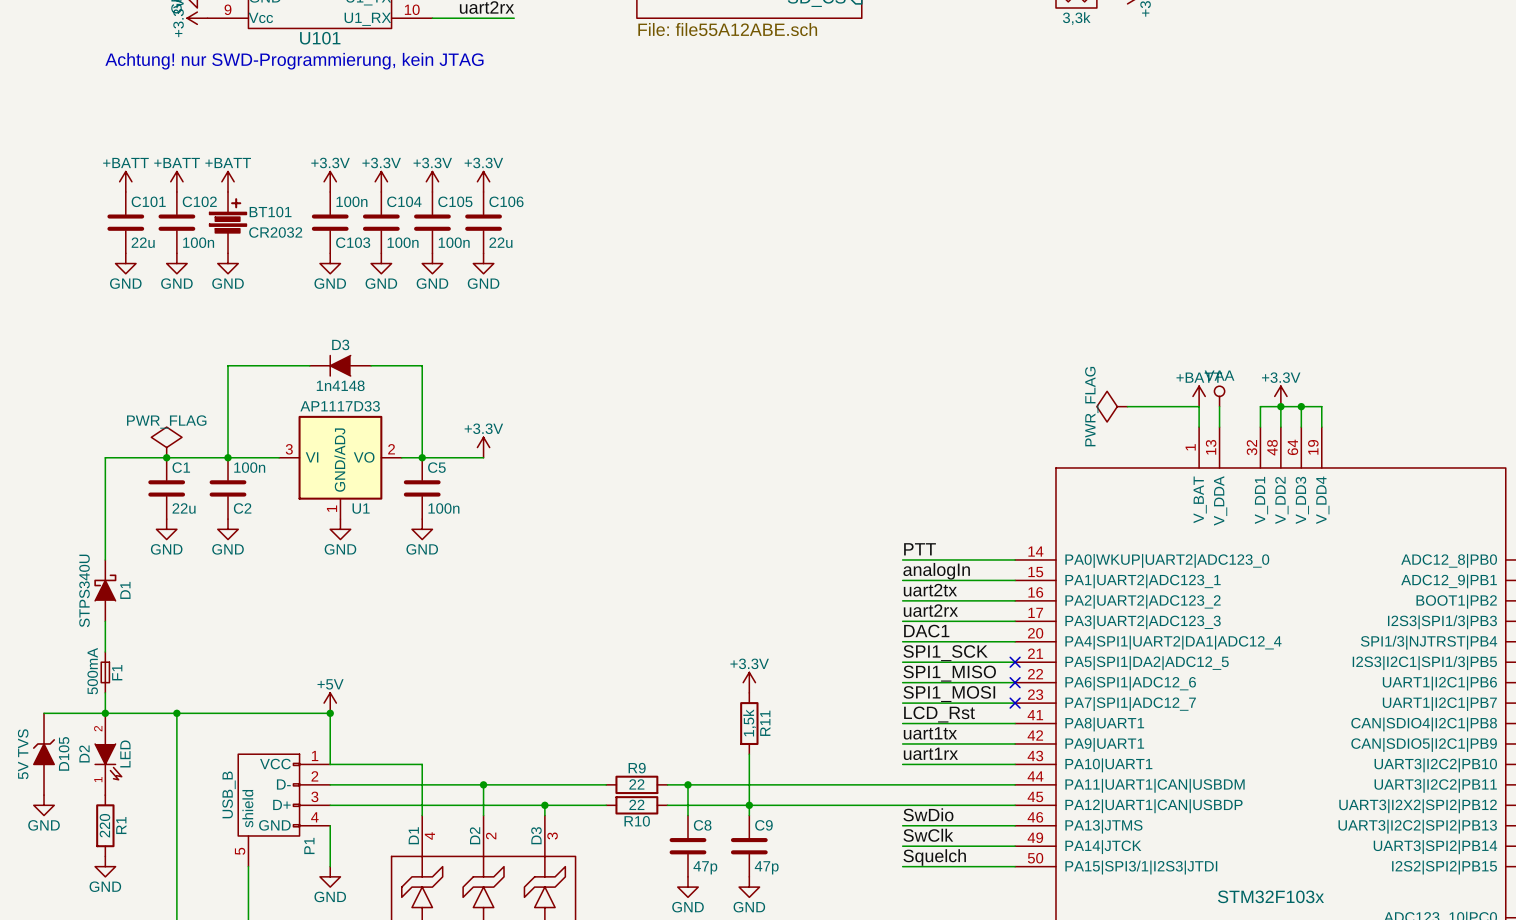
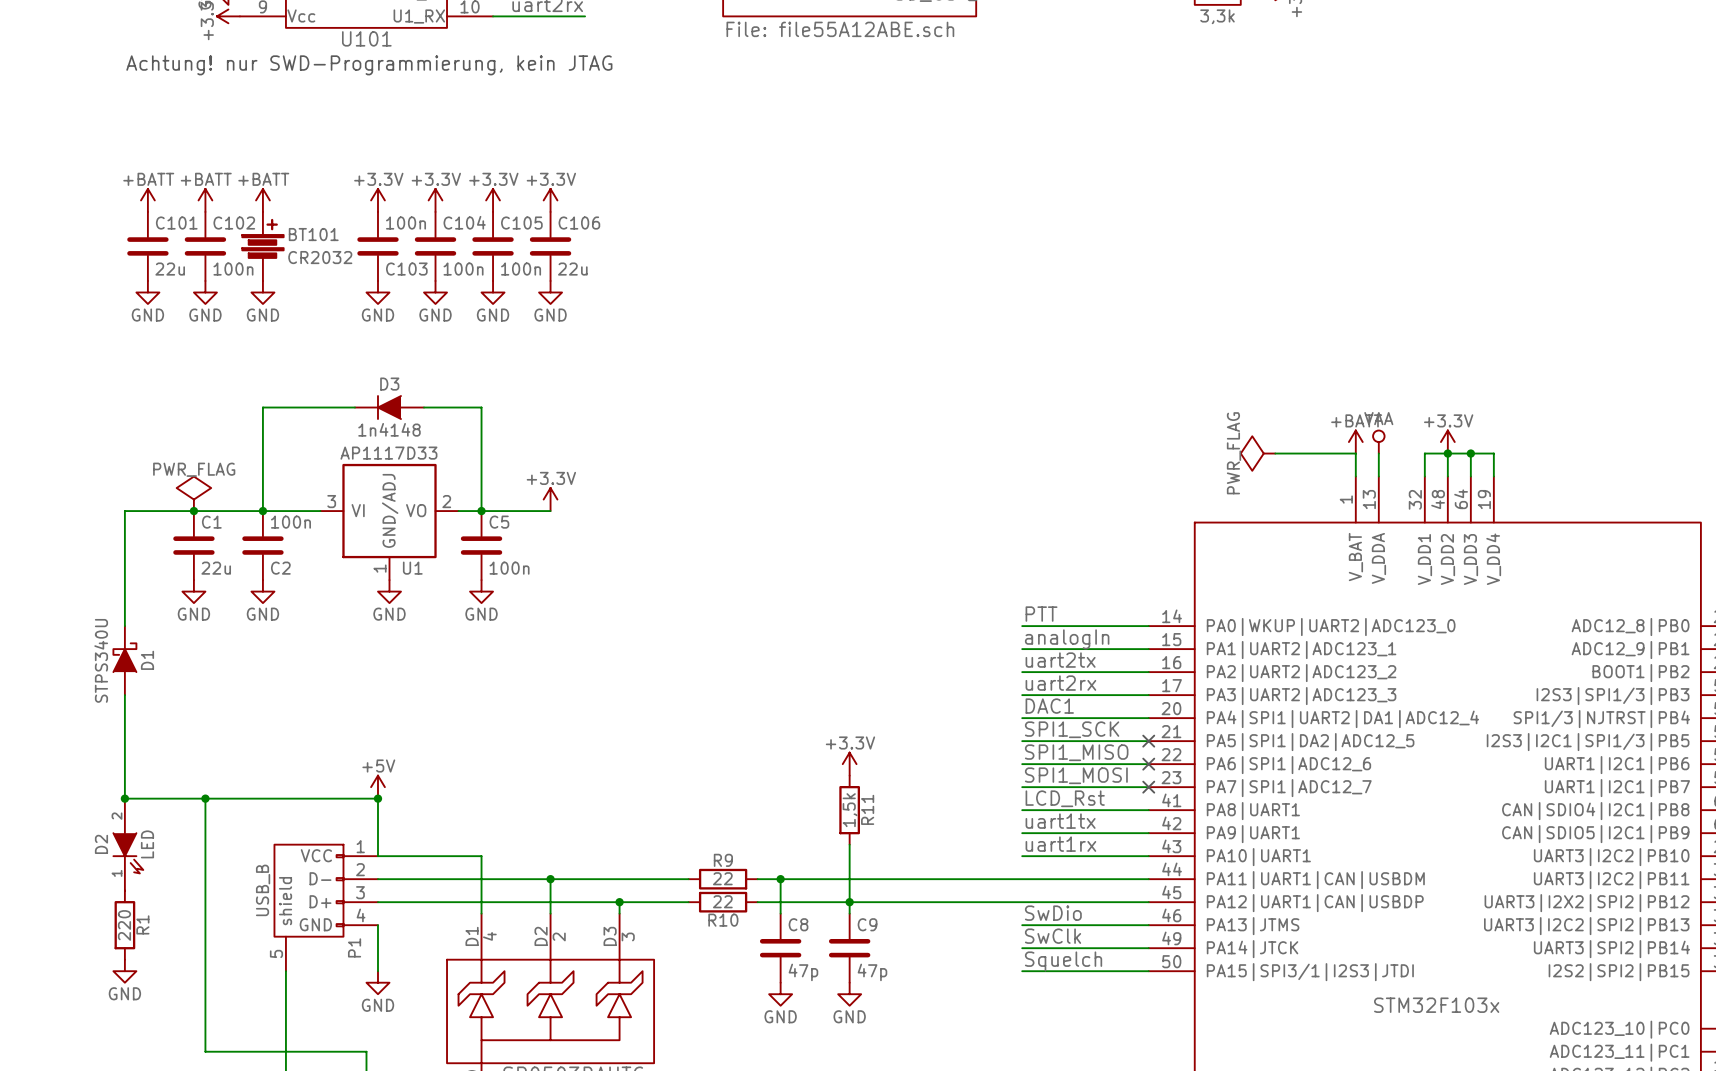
F1: 500mA (105, 672) -> none
wire: (44, 713) (105, 713) -> none
D105: 5V TVS (44, 754) -> none
power symbol: GND (44, 805) -> none

